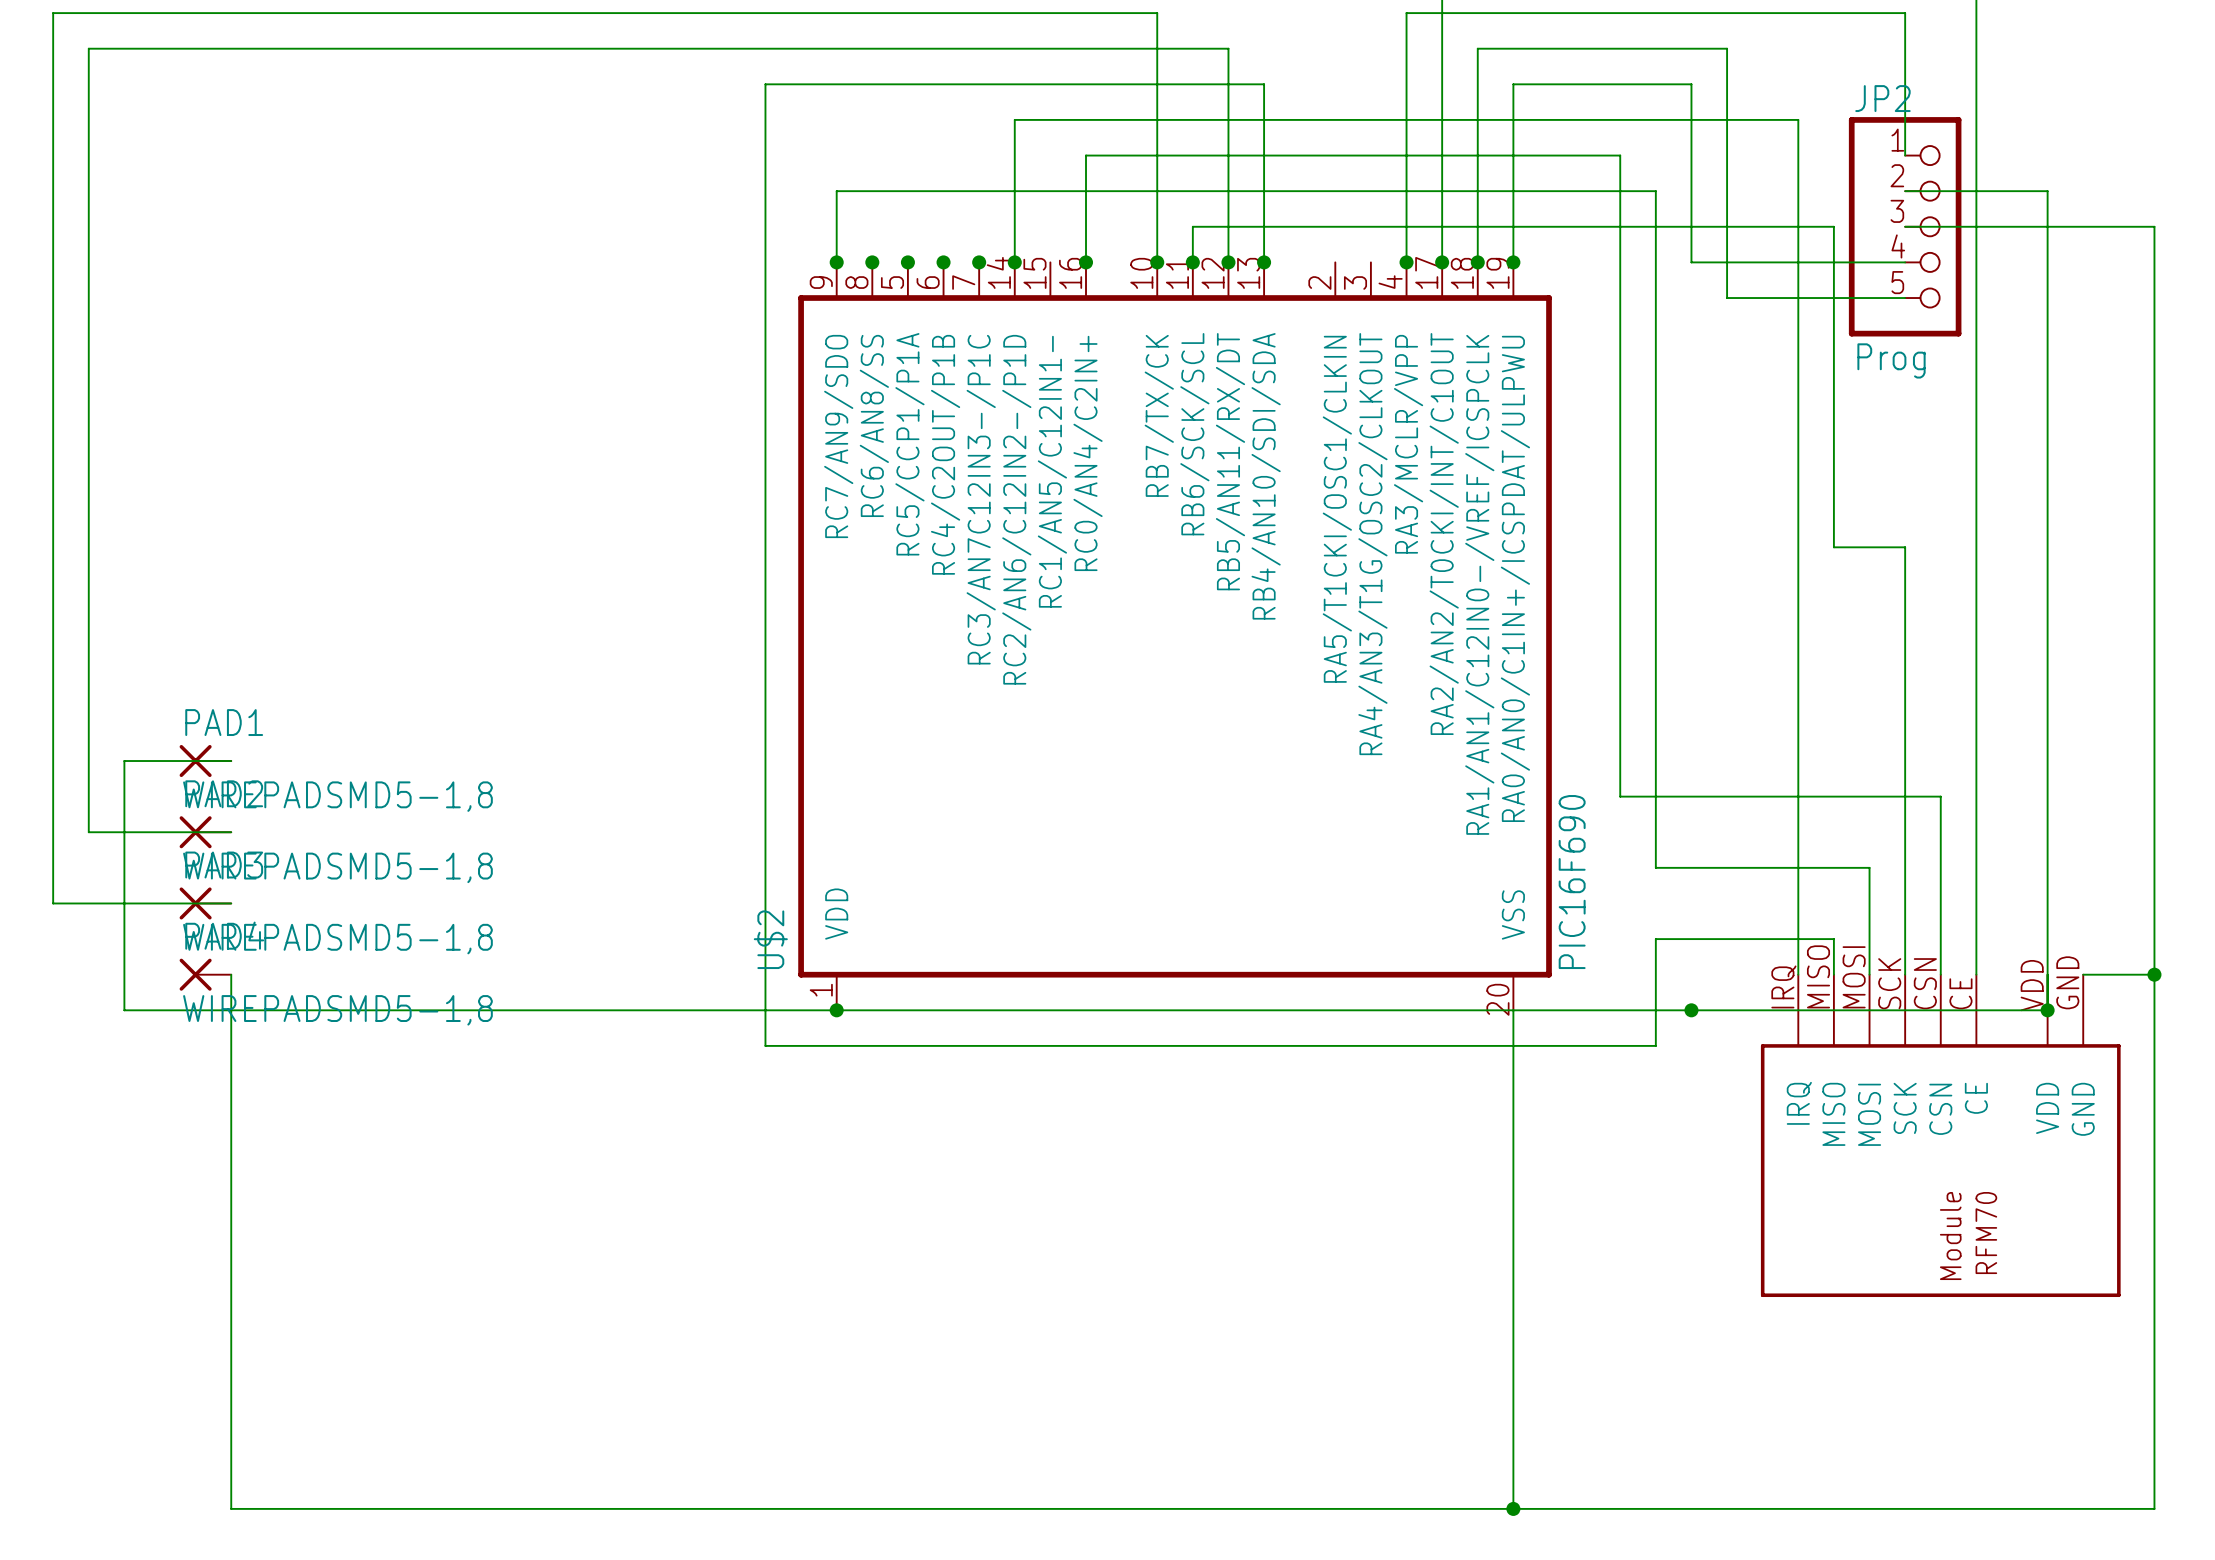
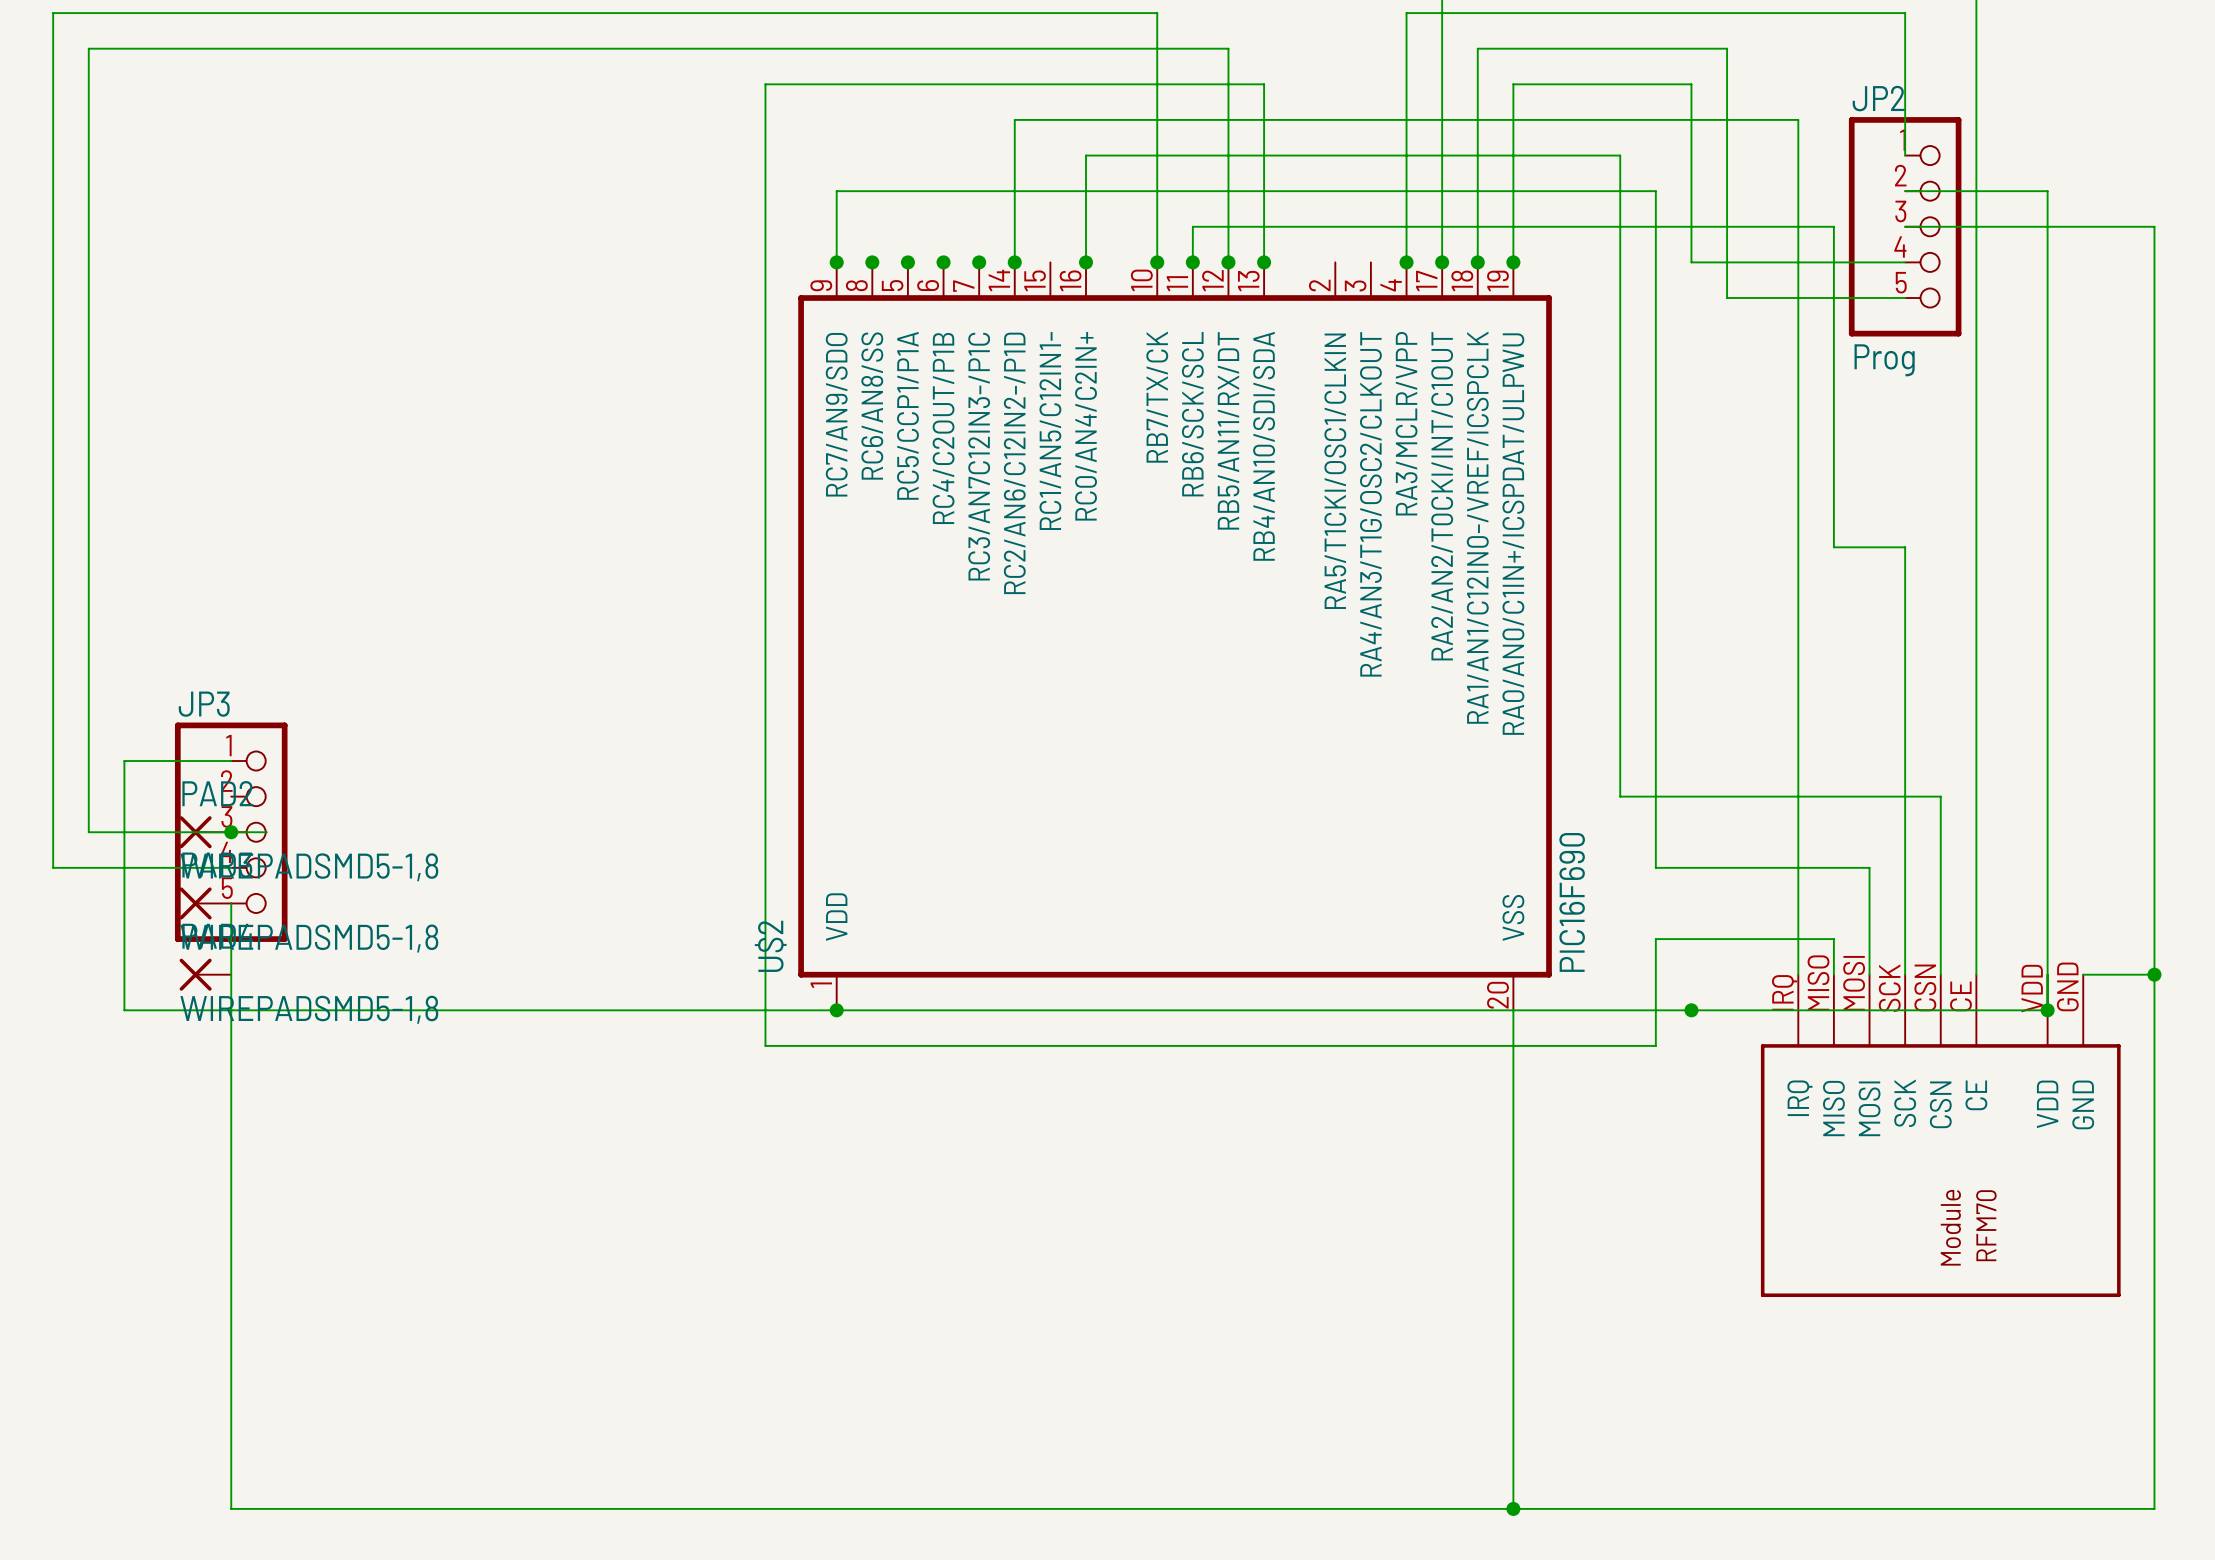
PAD1: WIREPADSMD5-1,8 (205, 761) -> none
wire: none -> (231, 832) (266, 832)
JP3: none -> (231, 832)
junction: none -> (231, 832)
wire: (53, 867) (53, 903) (231, 903) -> (53, 867) (231, 867)
wire: none -> (231, 903) (231, 974)

